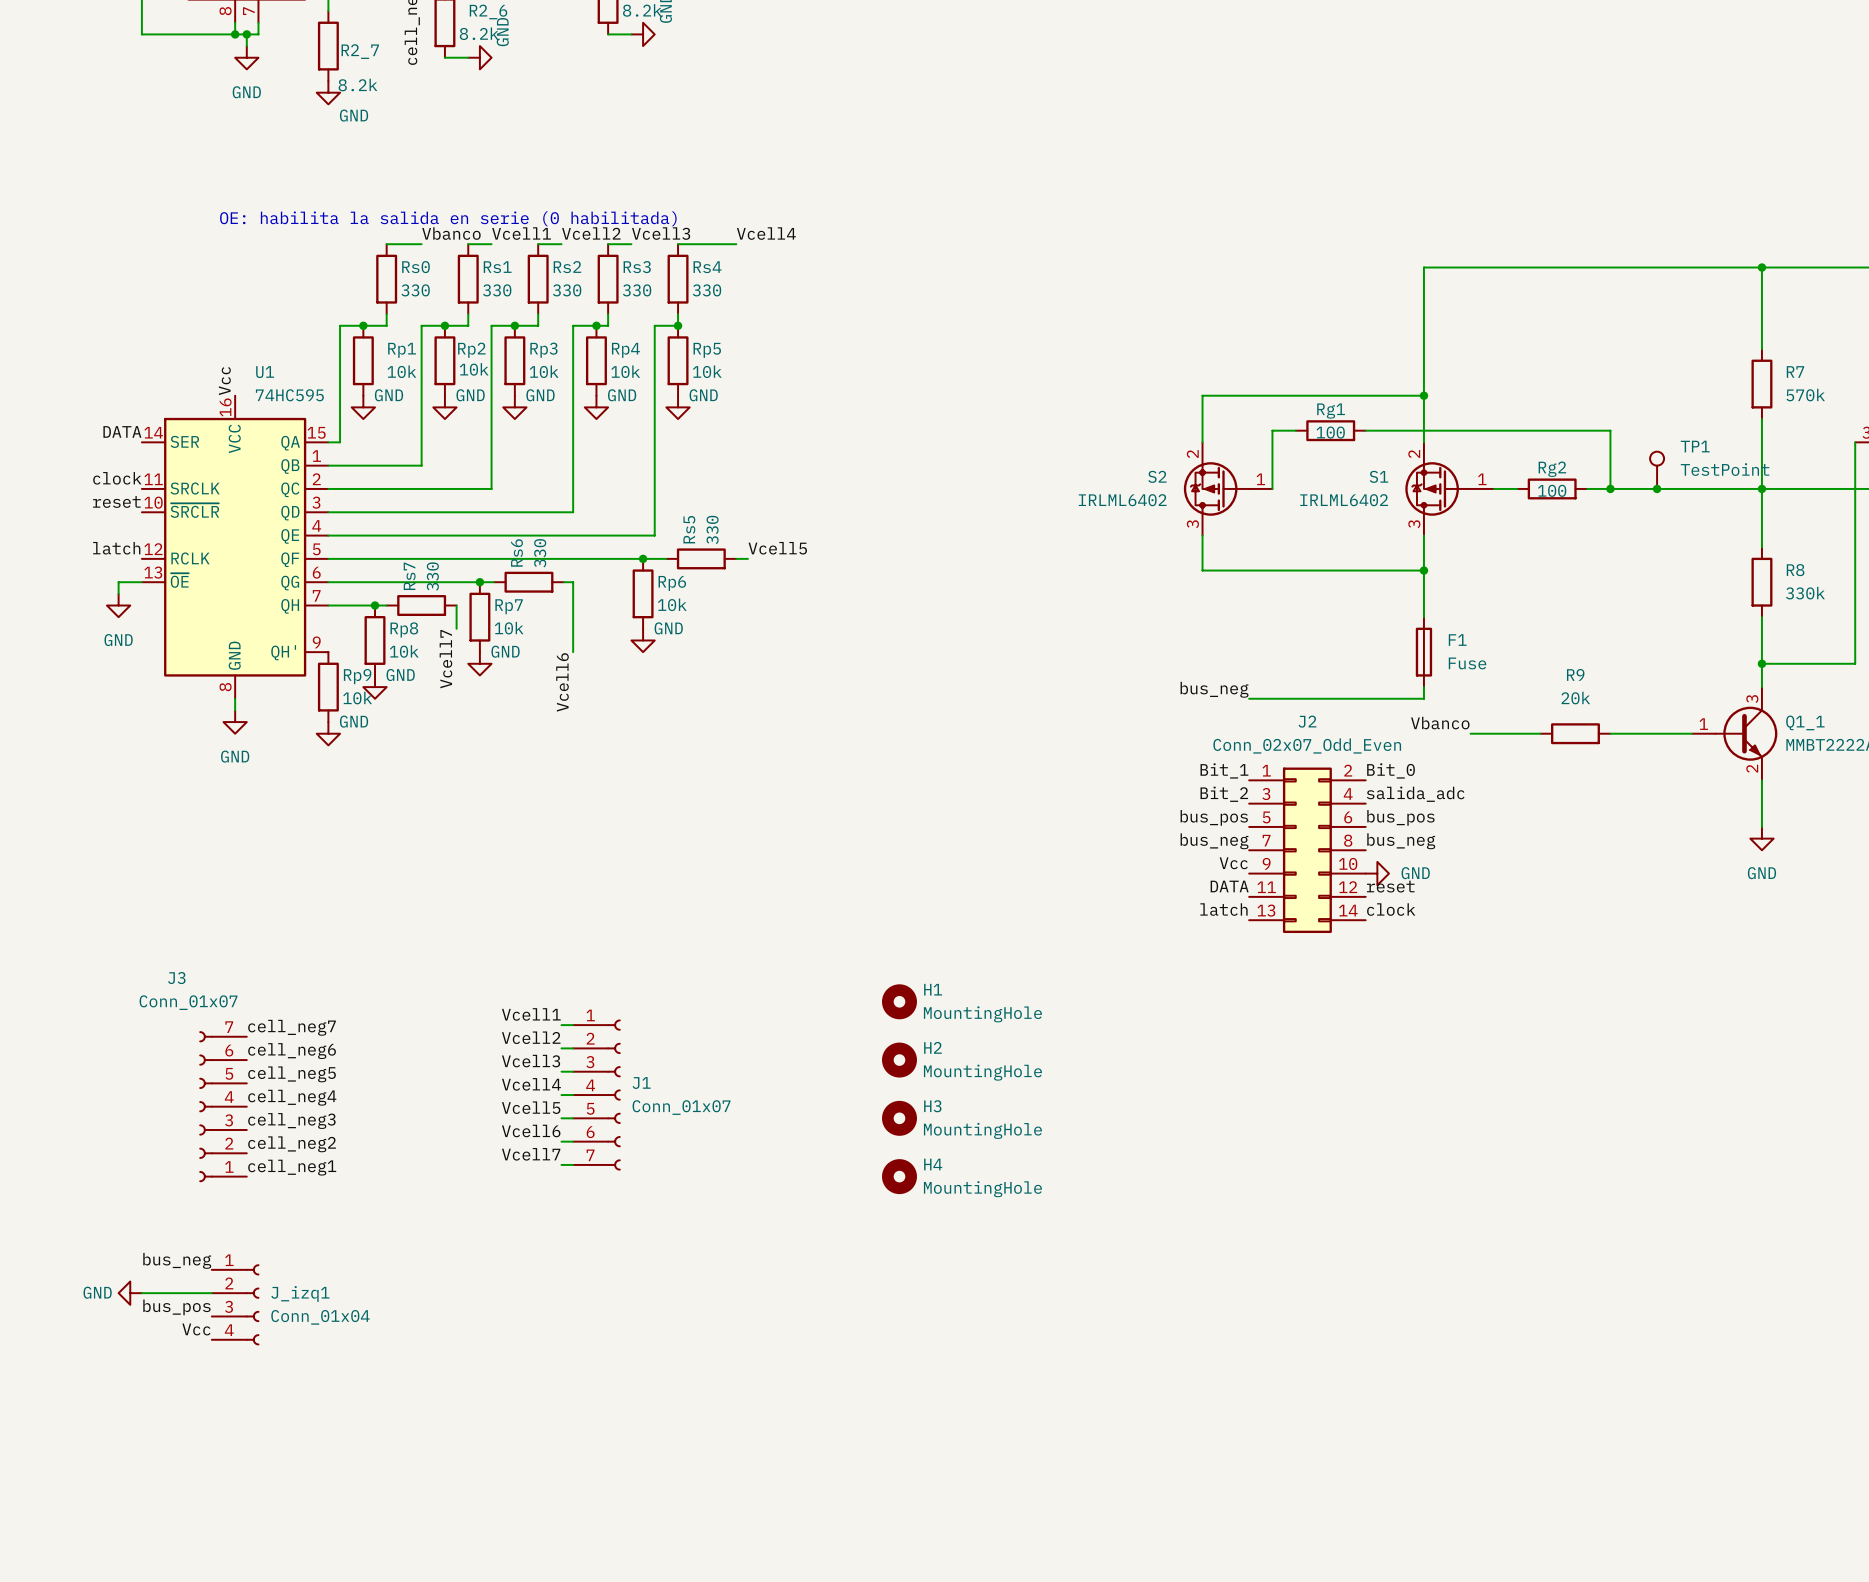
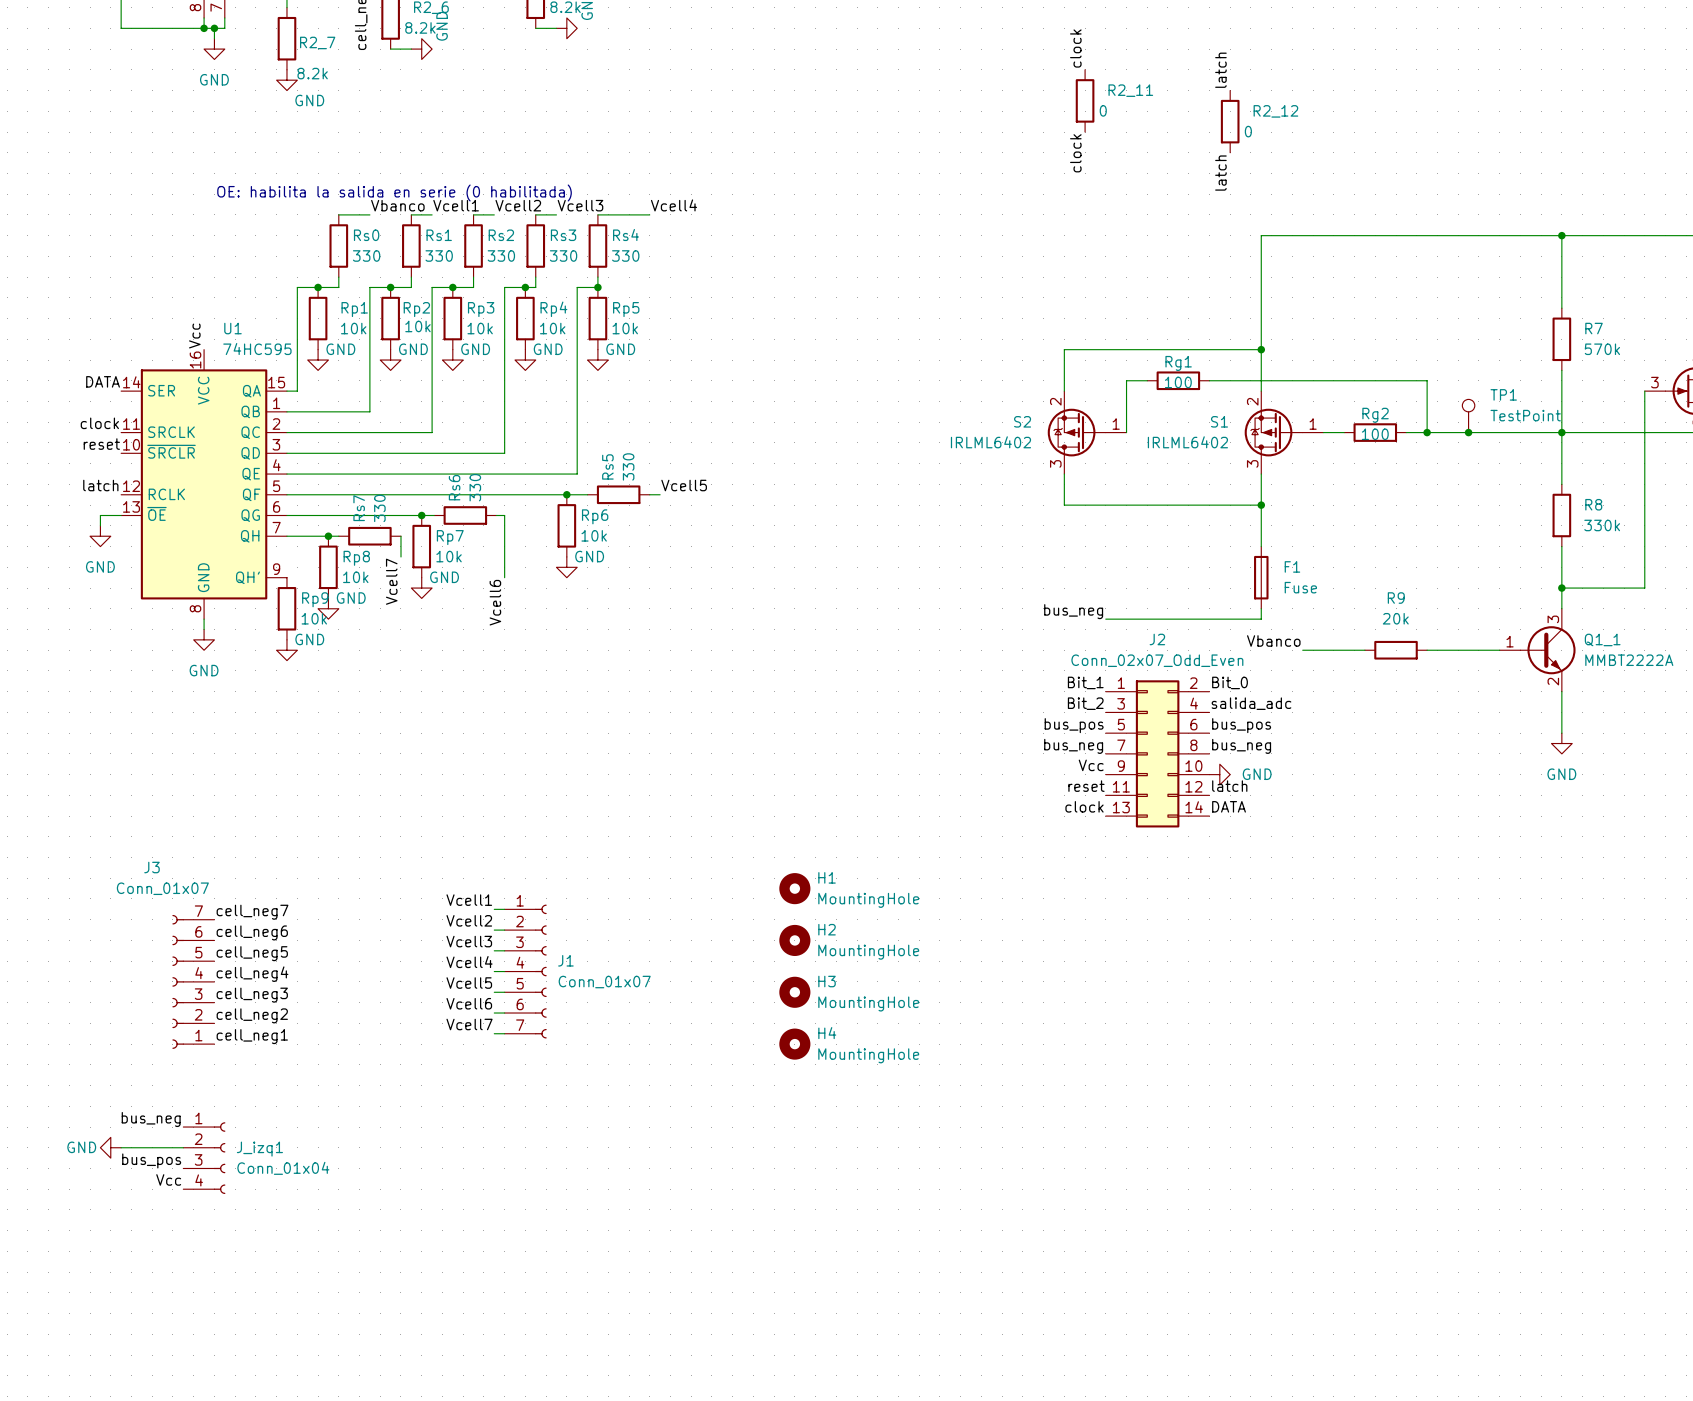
label: none -> clock (1075, 48)
label: none -> latch (1220, 70)
R2_11: none -> 0 (1085, 100)
R2_12: none -> 0 (1230, 121)
label: none -> clock (1075, 153)
label: none -> latch (1220, 173)
label: DATA (1229, 886) -> reset (1086, 786)
label: reset (1390, 886) -> latch (1229, 786)
label: latch (1223, 909) -> clock (1084, 806)
label: clock (1391, 909) -> DATA (1229, 806)

